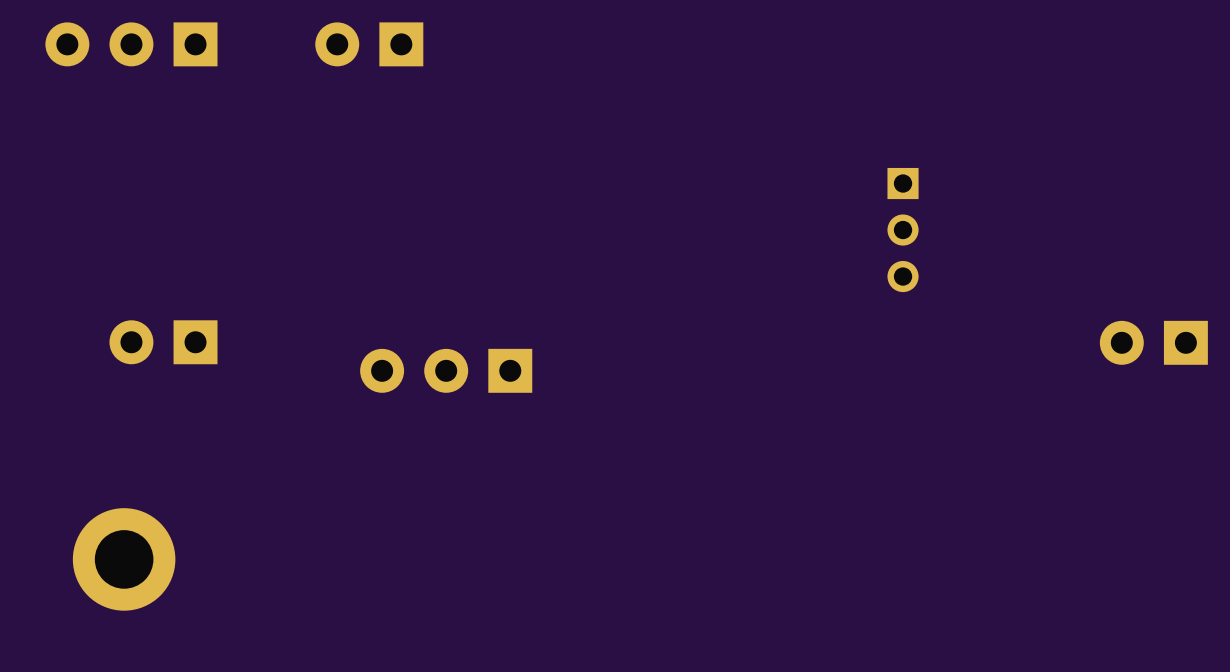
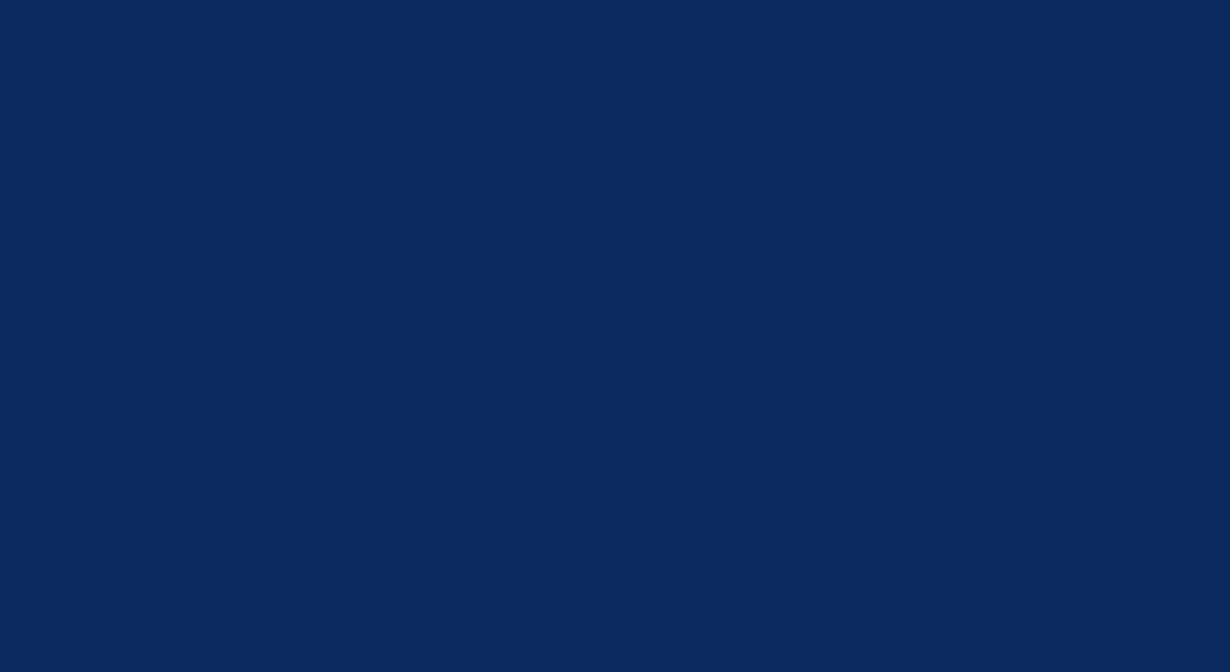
part: (131, 44) -> none
part: (369, 44) -> none
part: (903, 230) -> none
part: (163, 342) -> none
part: (1153, 342) -> none
part: (446, 370) -> none
part: (124, 559) -> none

